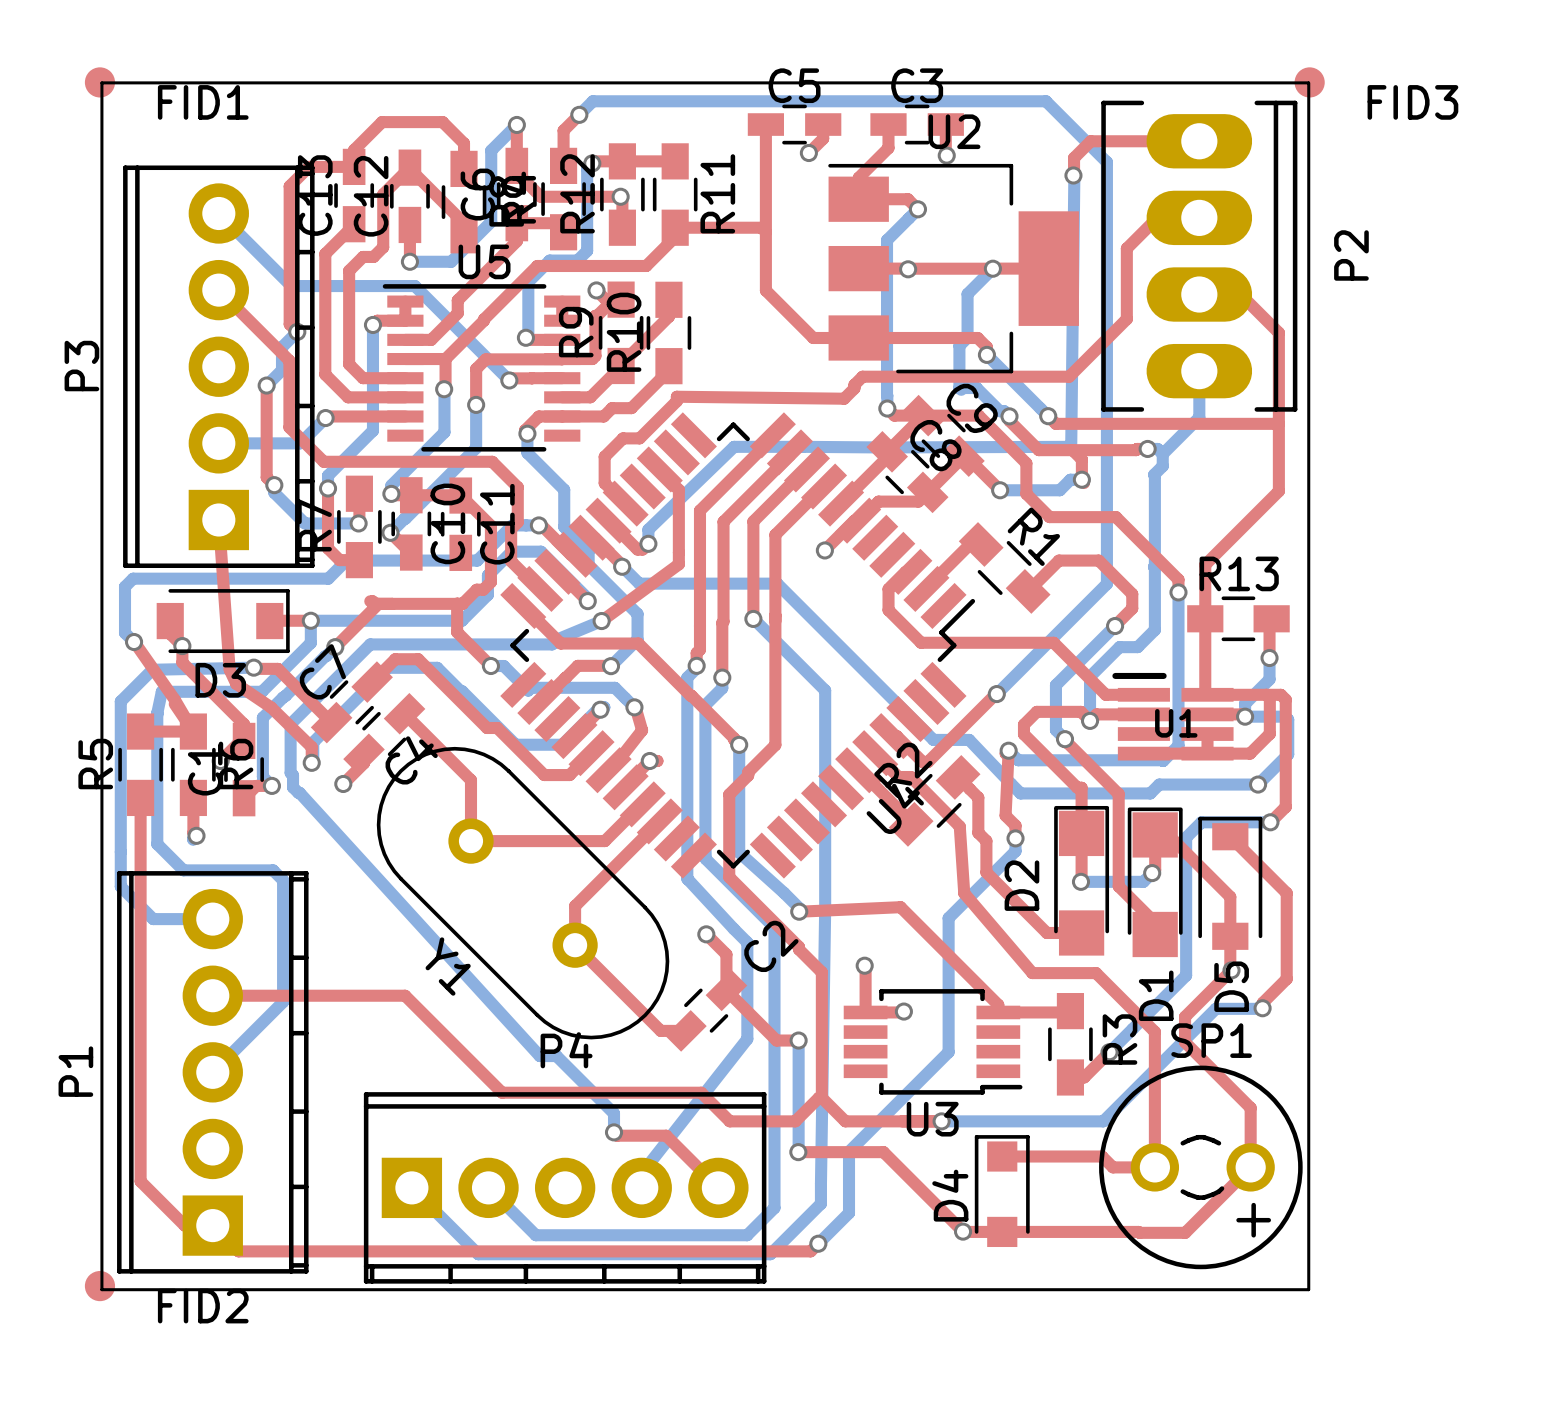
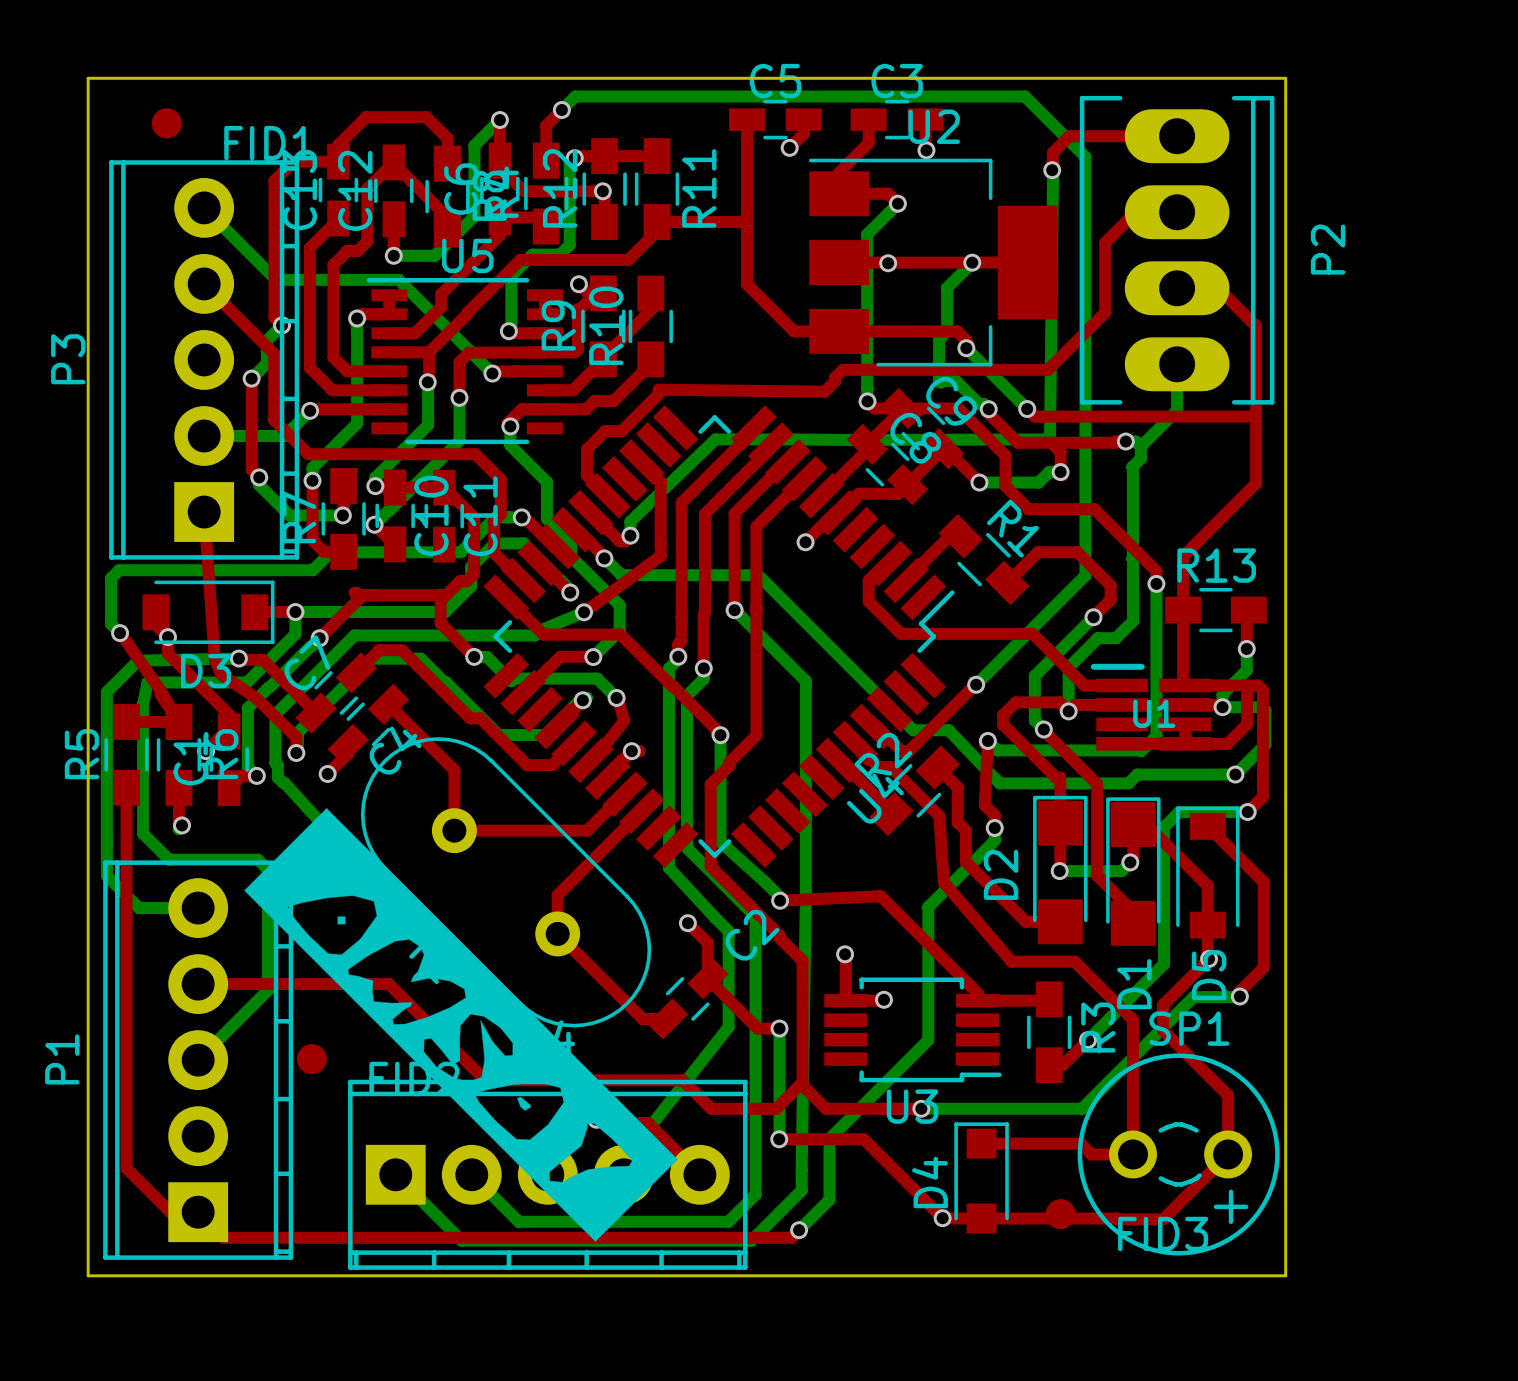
FID1 position: (99, 82) -> (166, 123)
FID3 position: (1309, 82) -> (1060, 1214)
drawing: none -> [244, 808, 678, 1242]
FID2 position: (99, 1286) -> (311, 1059)

